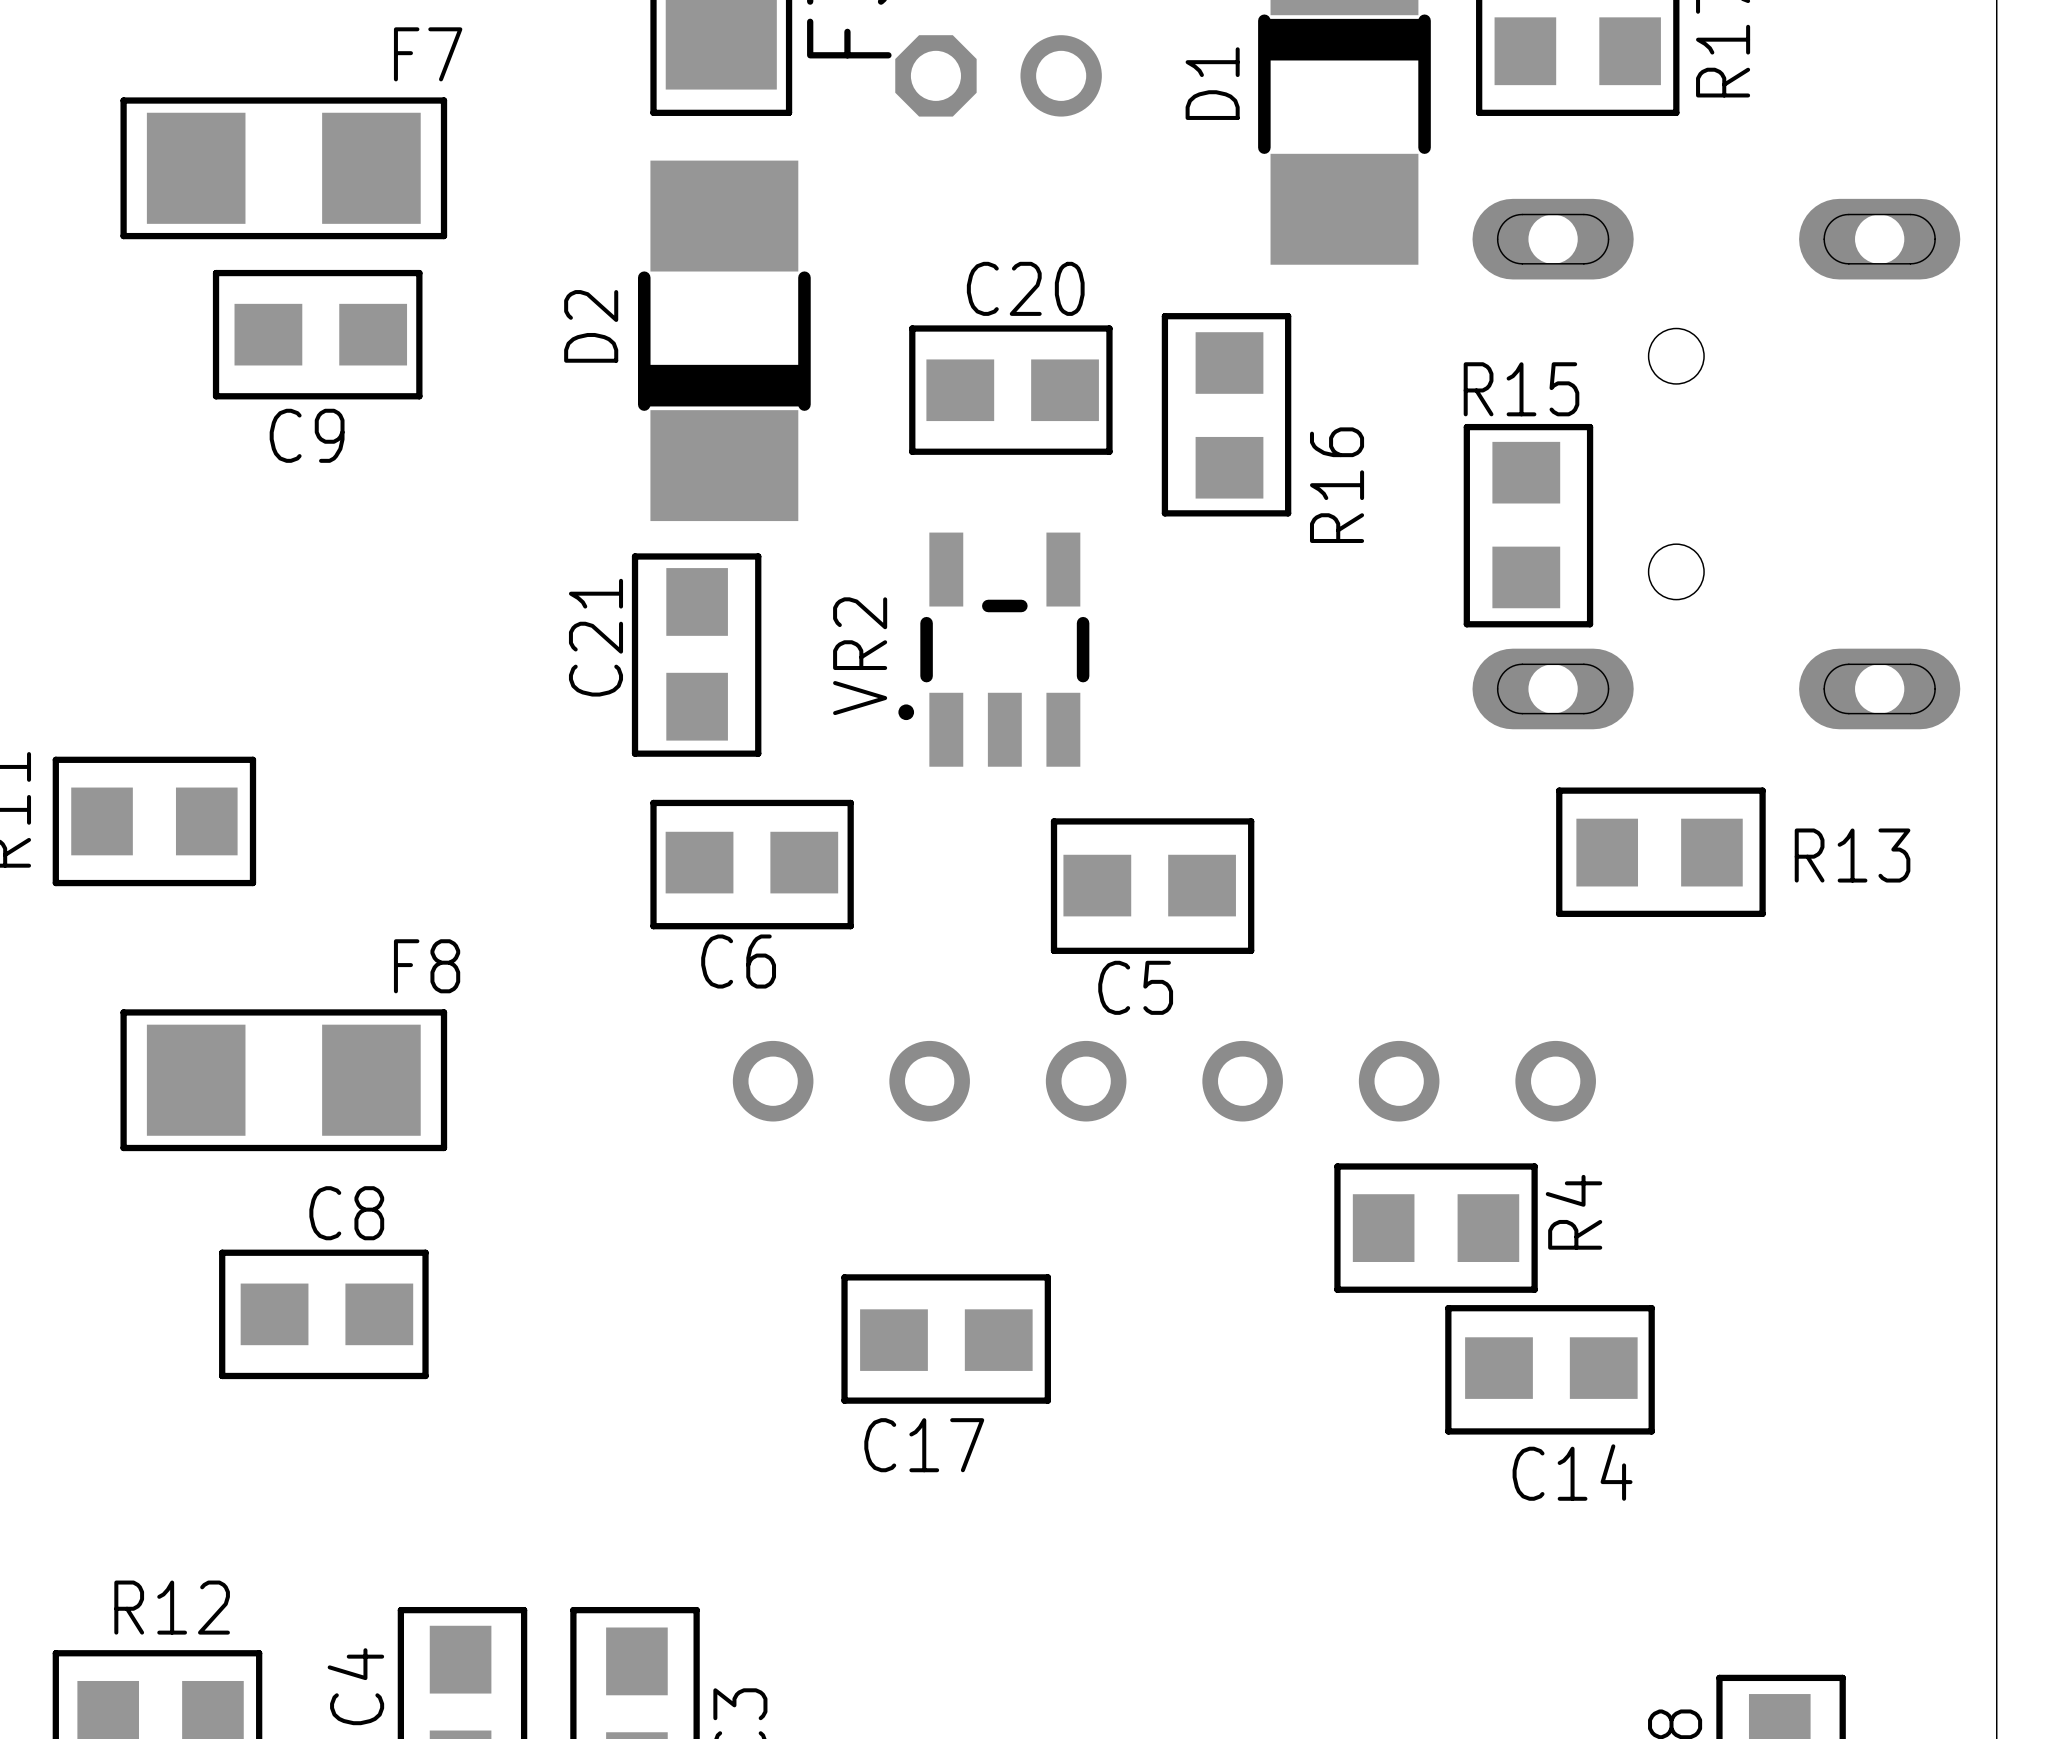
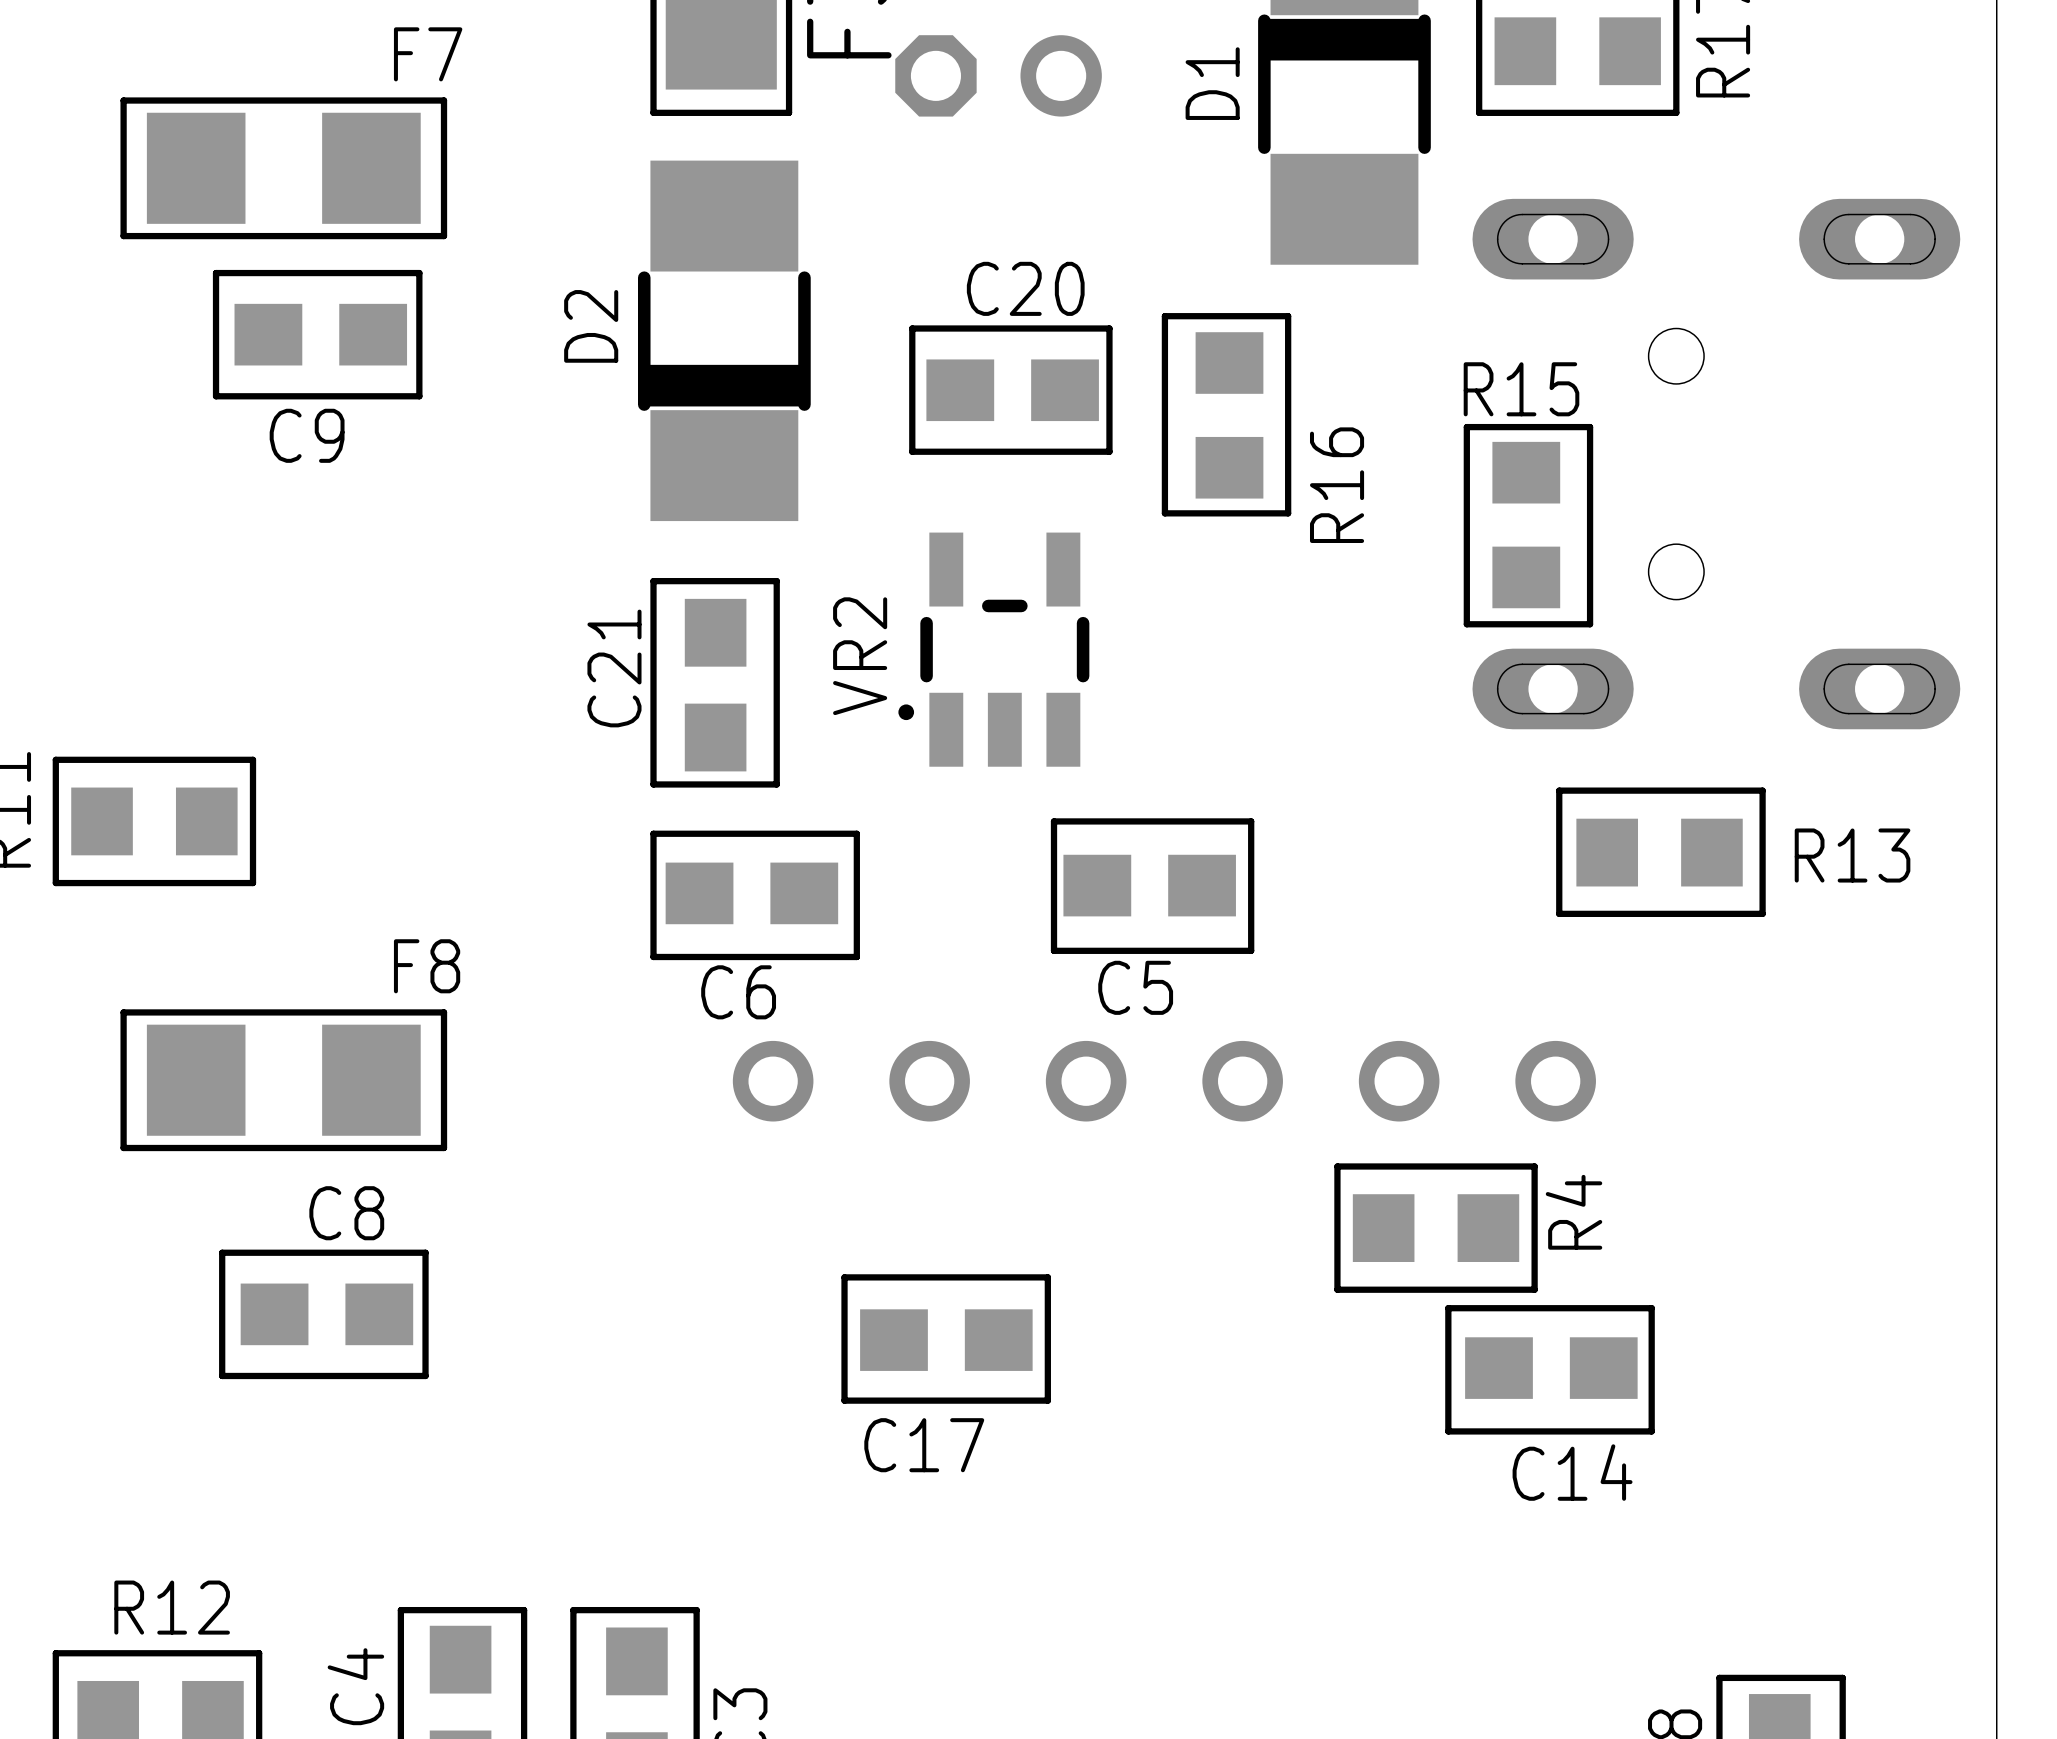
line: (758, 556) (758, 753) (635, 753) (635, 556) (758, 556) -> (776, 581) (776, 784) (653, 784) (653, 581) (776, 581)
C21 position: (697, 654) -> (715, 685)
line: (653, 833) (653, 802) (850, 802) (850, 926) (653, 926) -> (653, 833) (856, 833) (856, 956) (653, 956) (653, 926)
C6 position: (751, 862) -> (751, 893)

